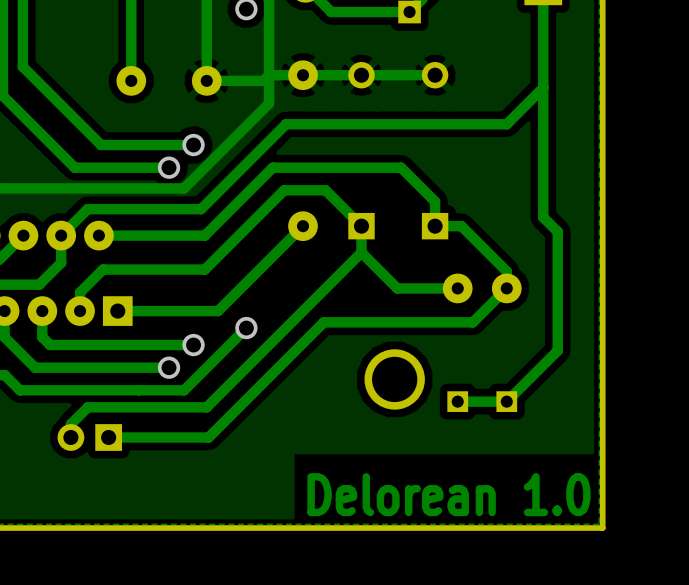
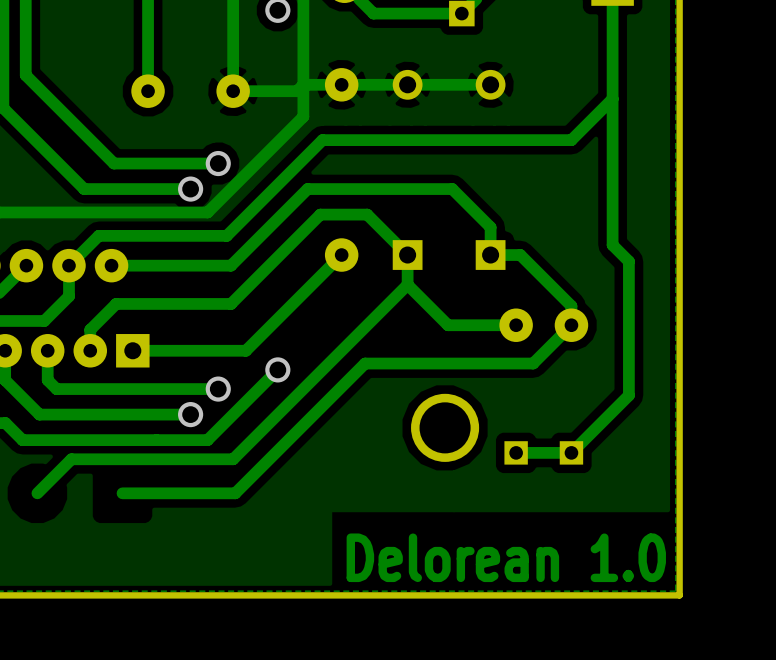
track: (87, 407) (70, 424) (70, 437) -> (99, 459) (71, 459) (37, 493)
part: (89, 437) -> none

